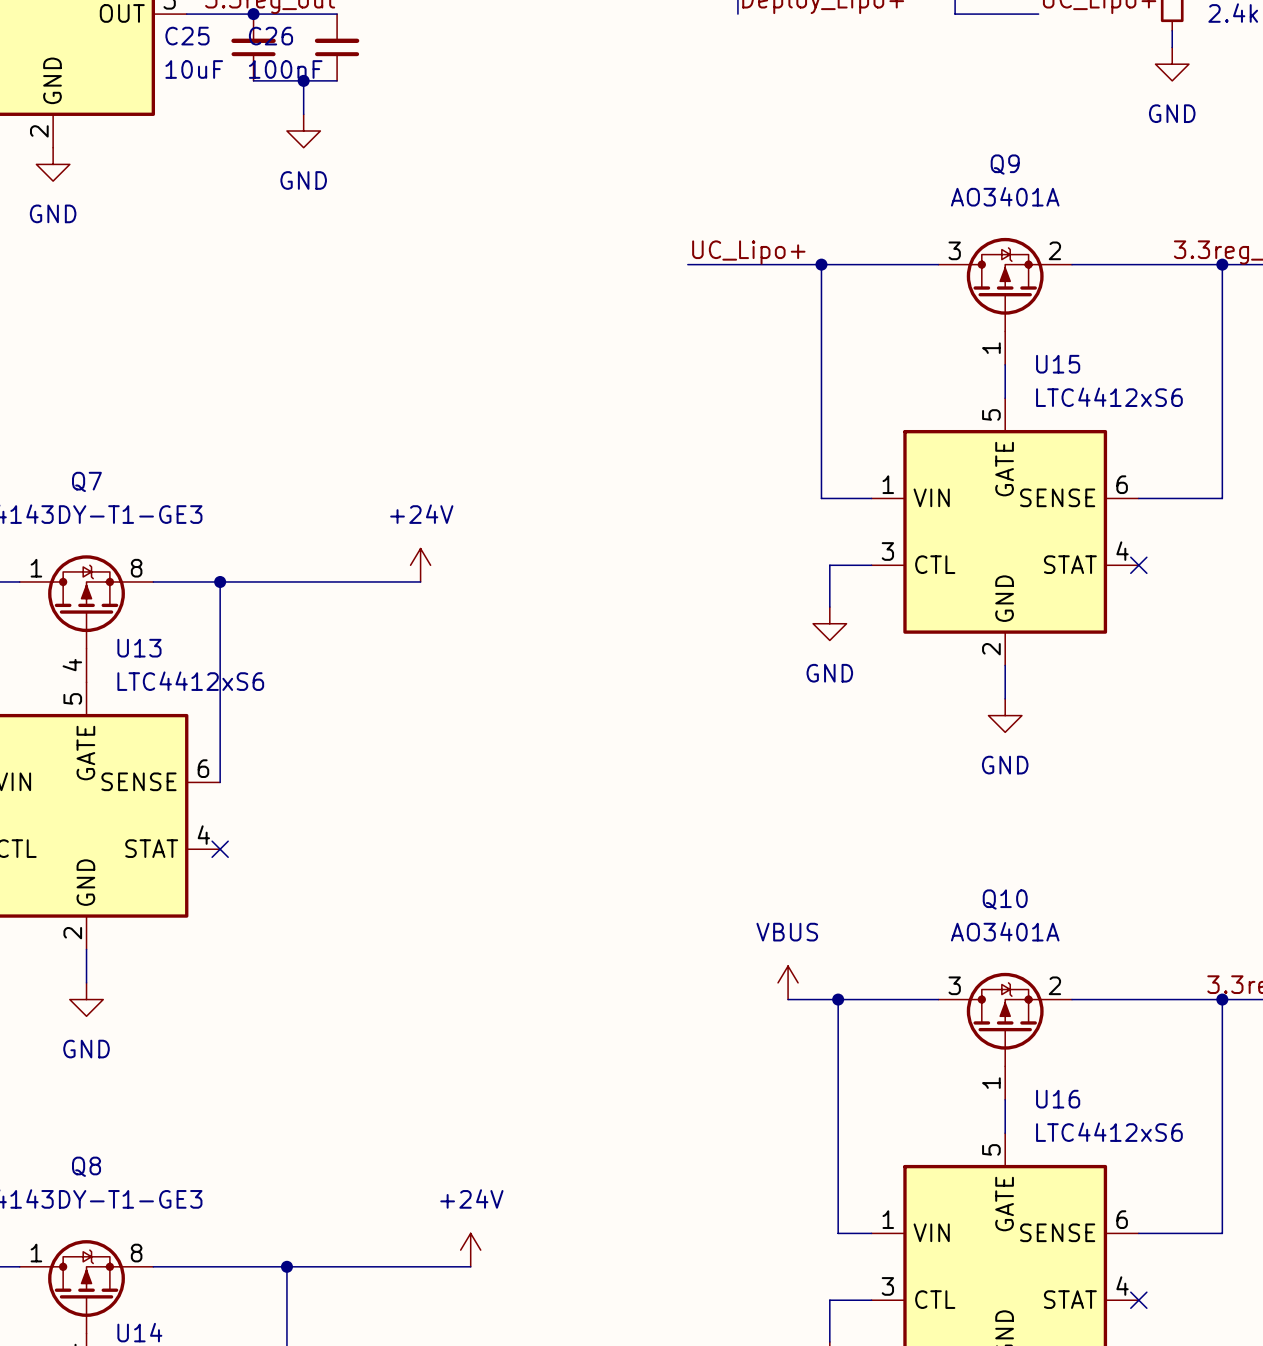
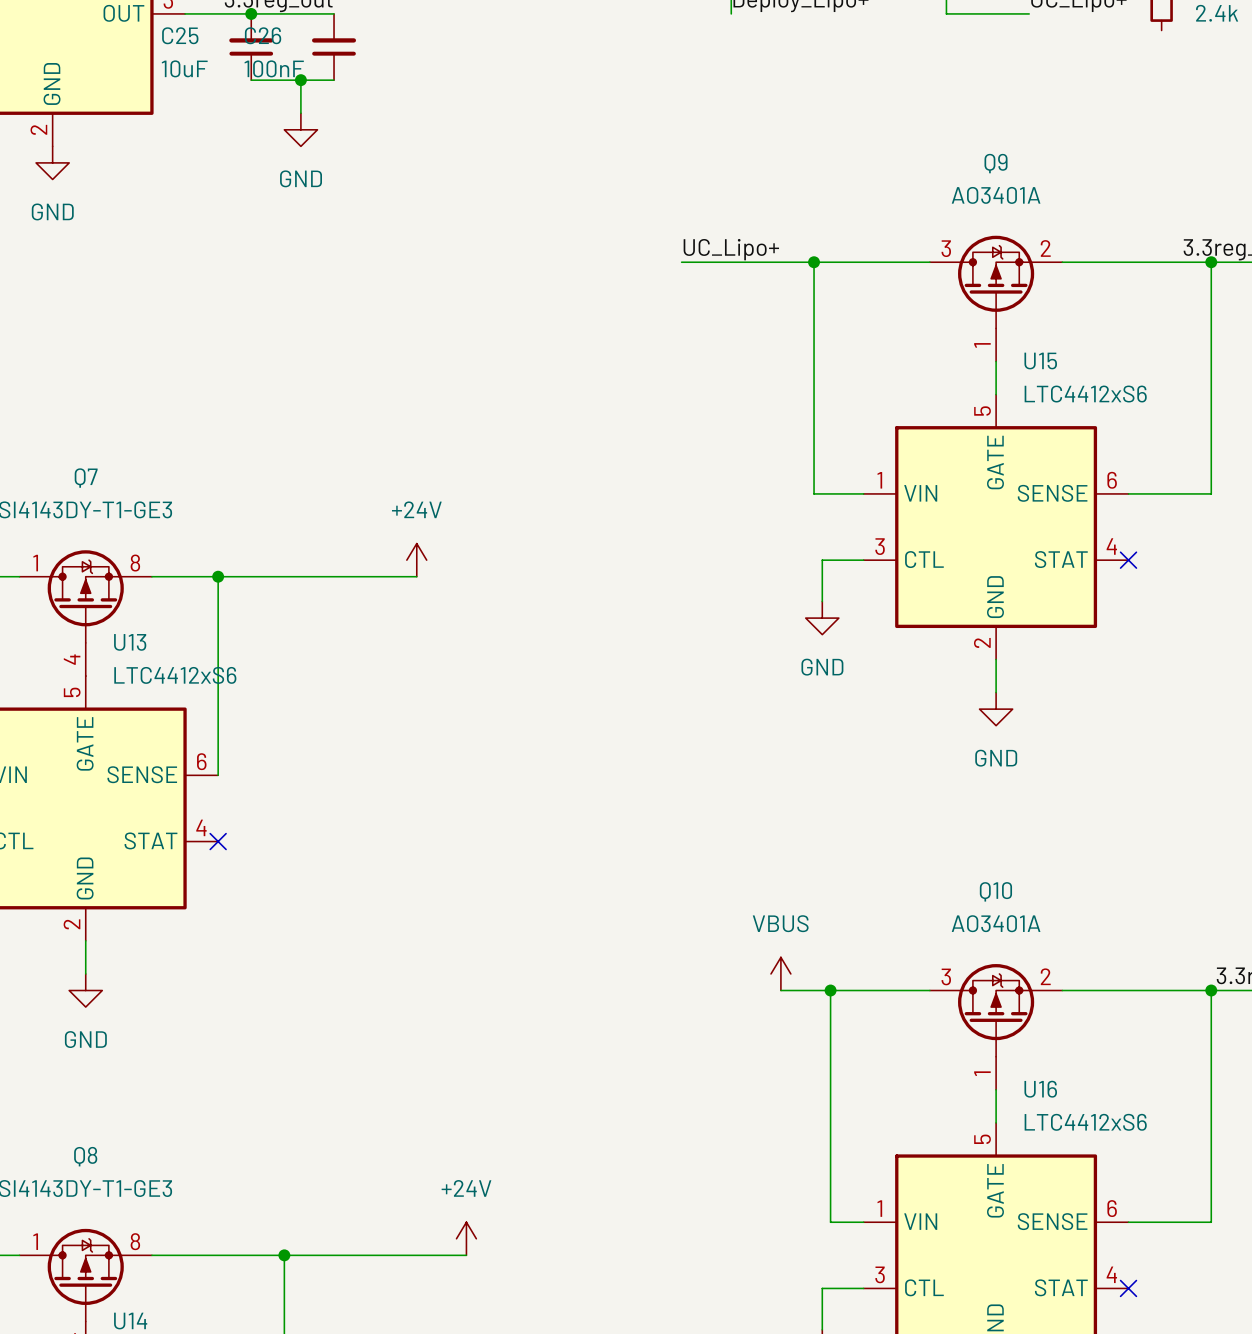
wire: (1172, 30) (1172, 47) -> none
power symbol: GND (1172, 64) -> none

